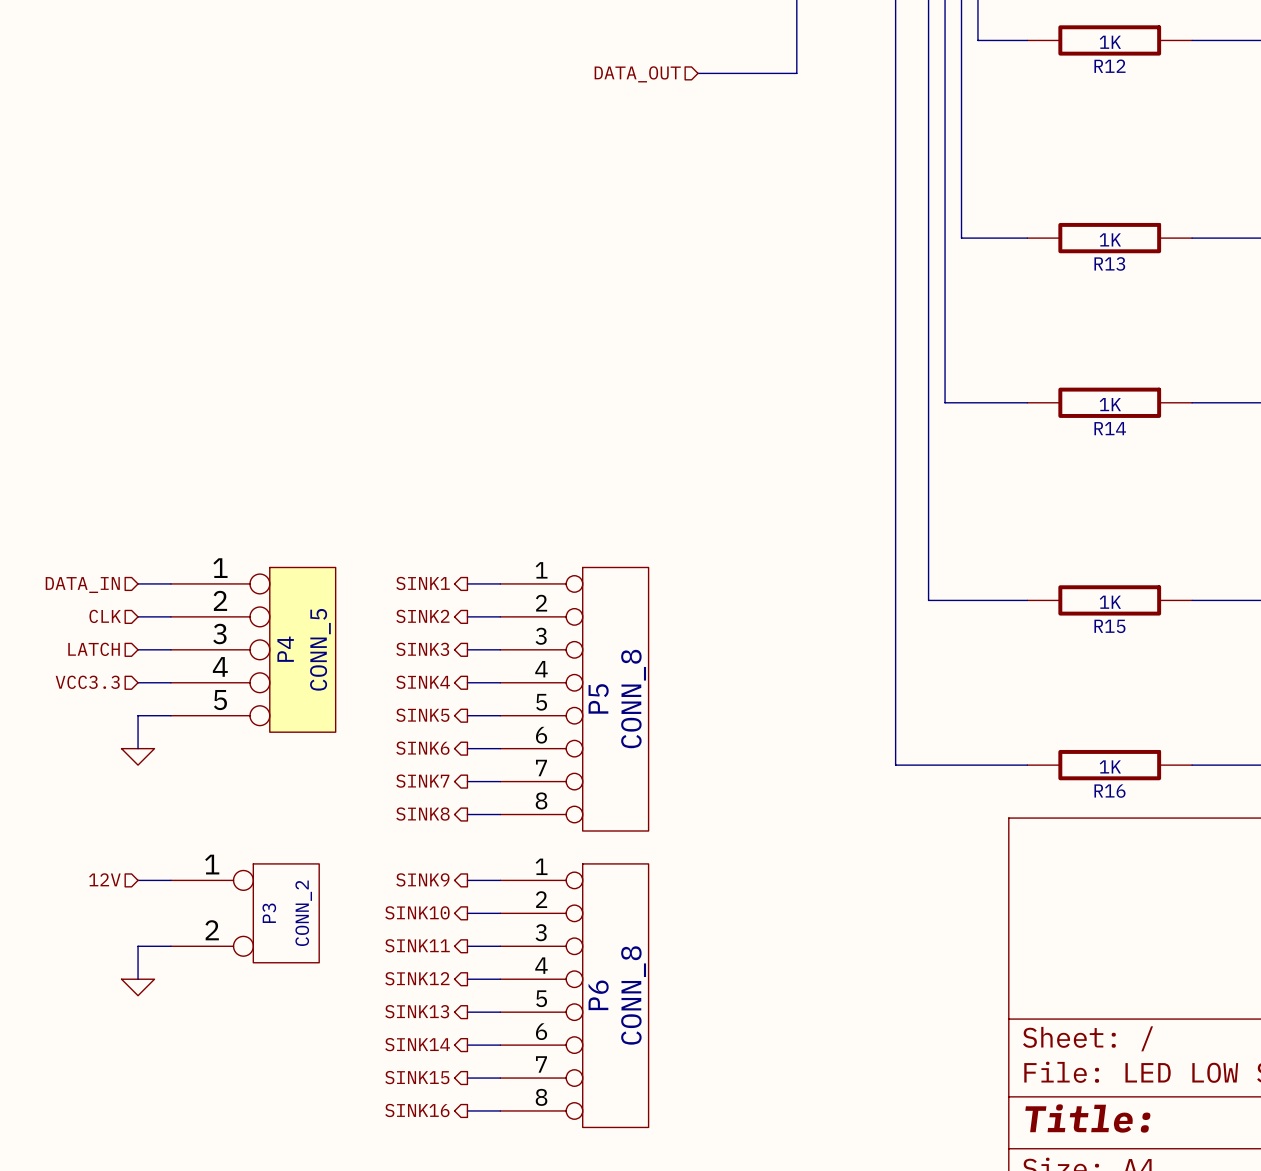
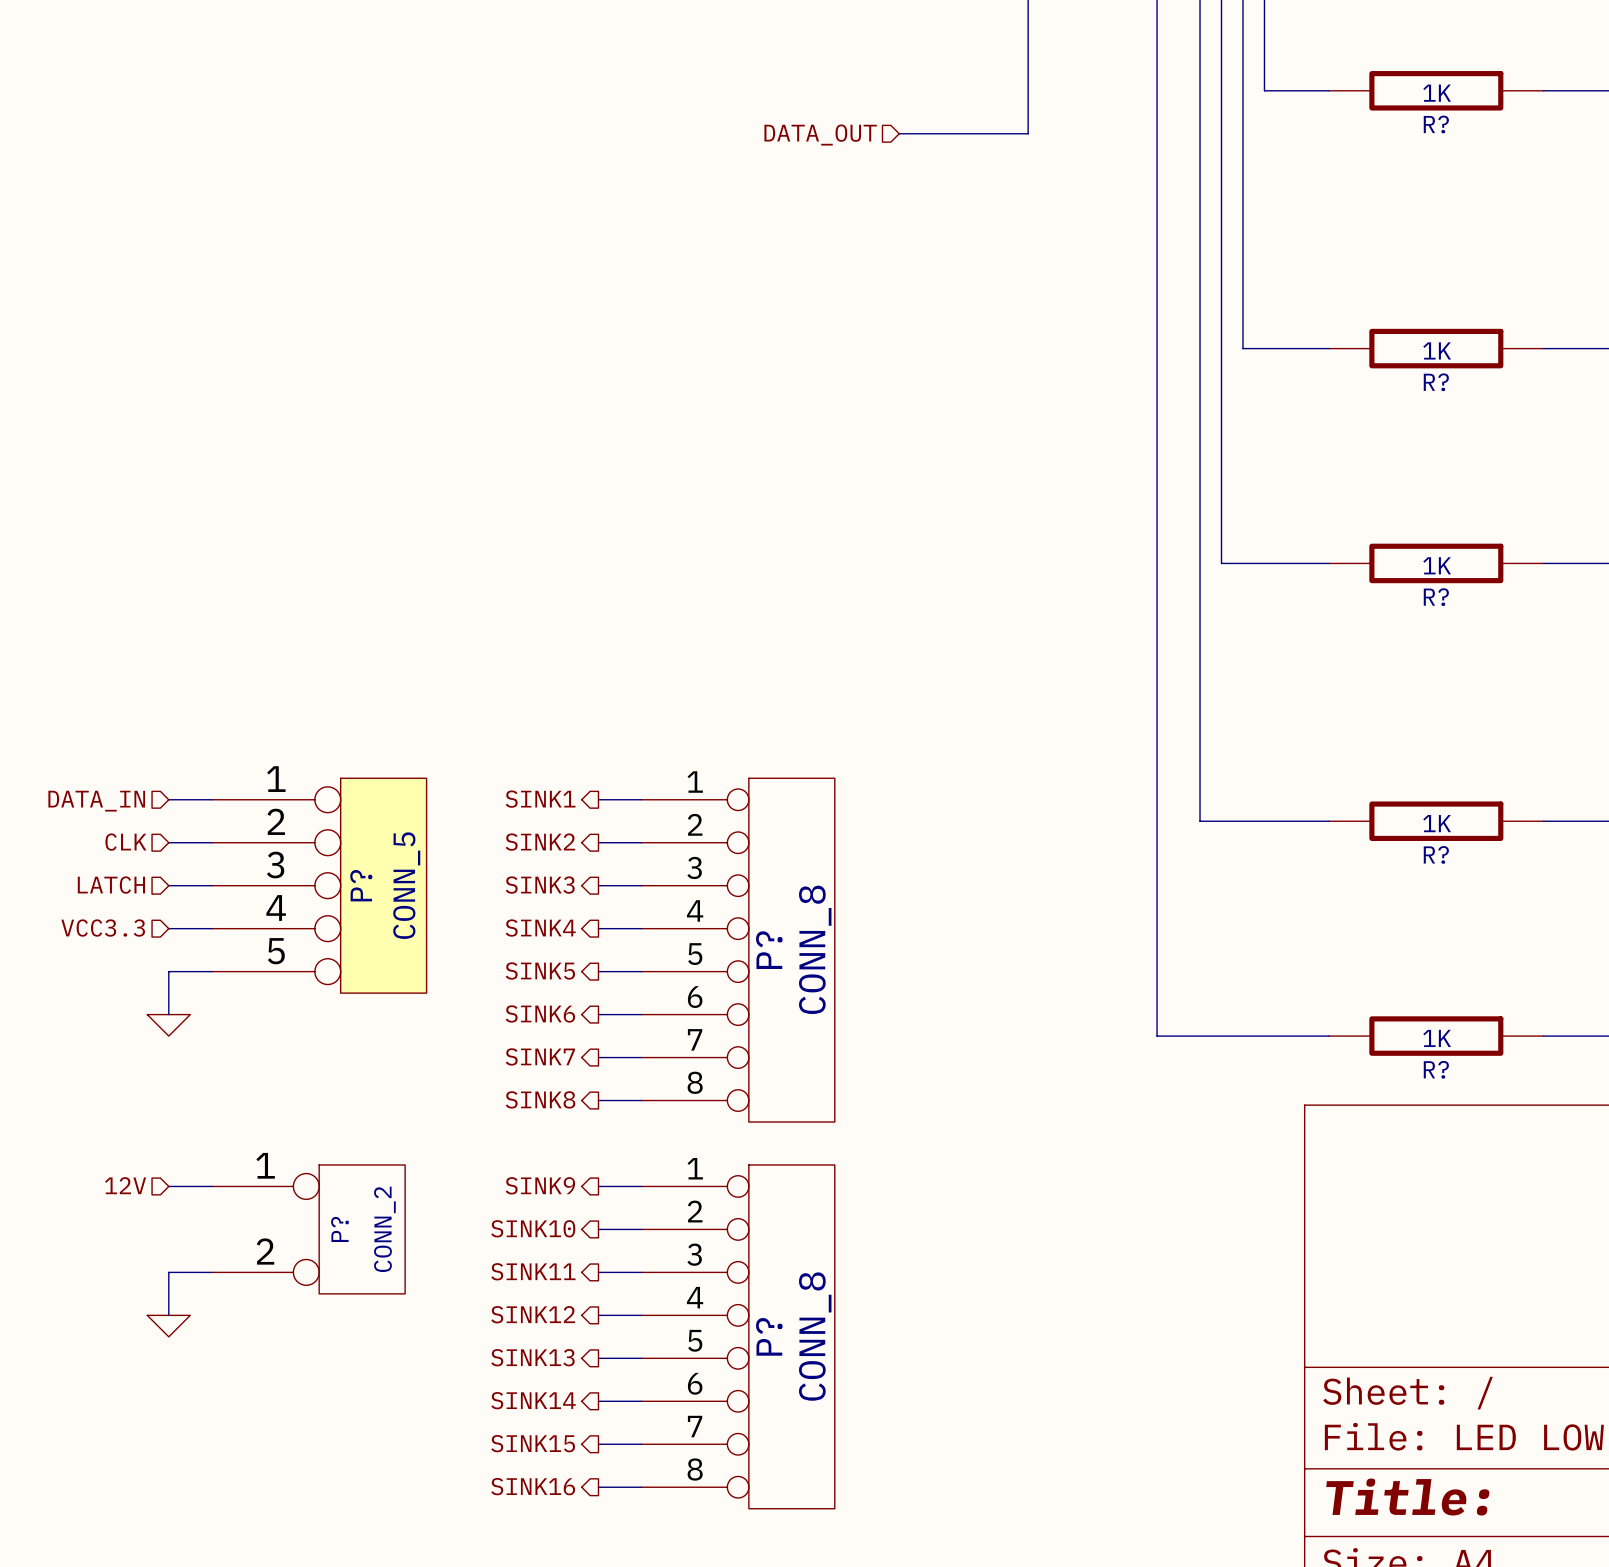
R12 name: R12 (1109, 66) -> R? (1436, 124)
R13 name: R13 (1109, 263) -> R? (1436, 382)
R14 name: R14 (1110, 428) -> R? (1436, 597)
R15 name: R15 (1109, 626) -> R? (1436, 854)
P4 name: P4 (285, 649) -> P? (361, 885)
P5 name: P5 (598, 698) -> P? (769, 950)
R16 name: R16 (1109, 791) -> R? (1436, 1069)
P3 name: P3 (269, 913) -> P? (339, 1229)
P6 name: P6 (598, 995) -> P? (769, 1336)

